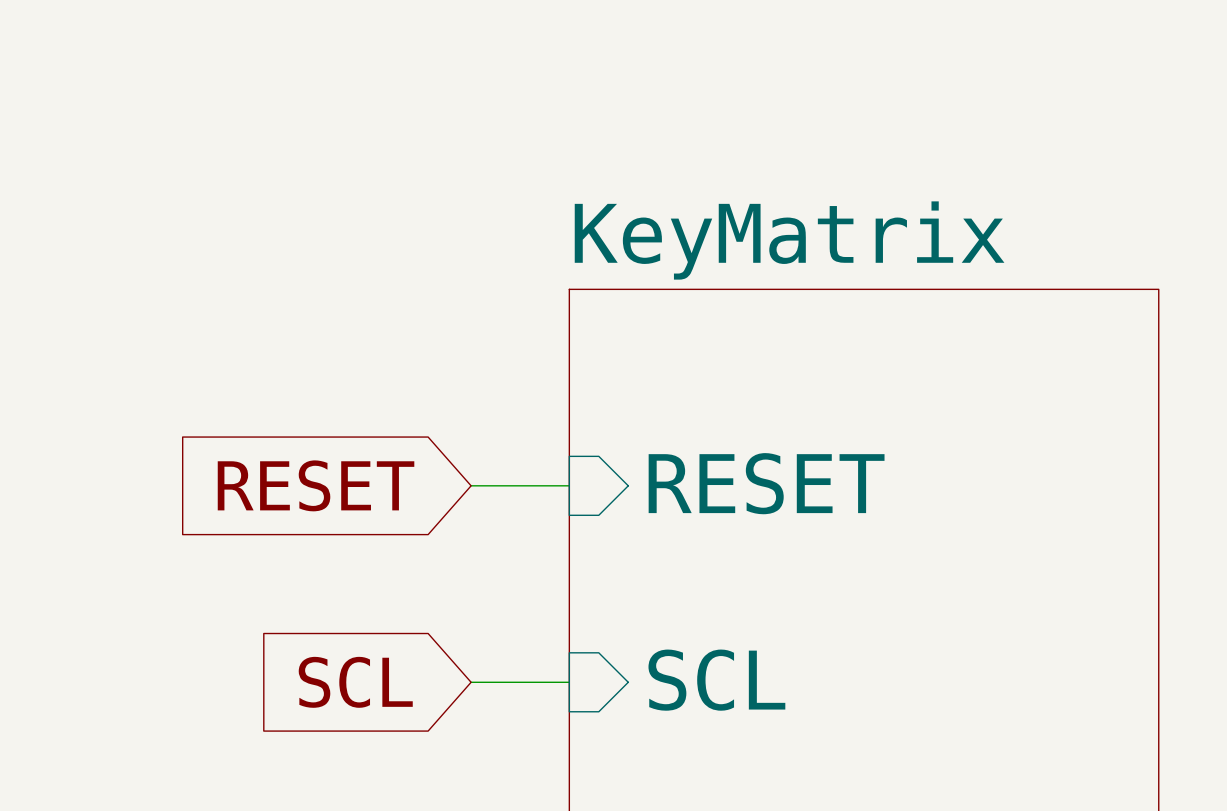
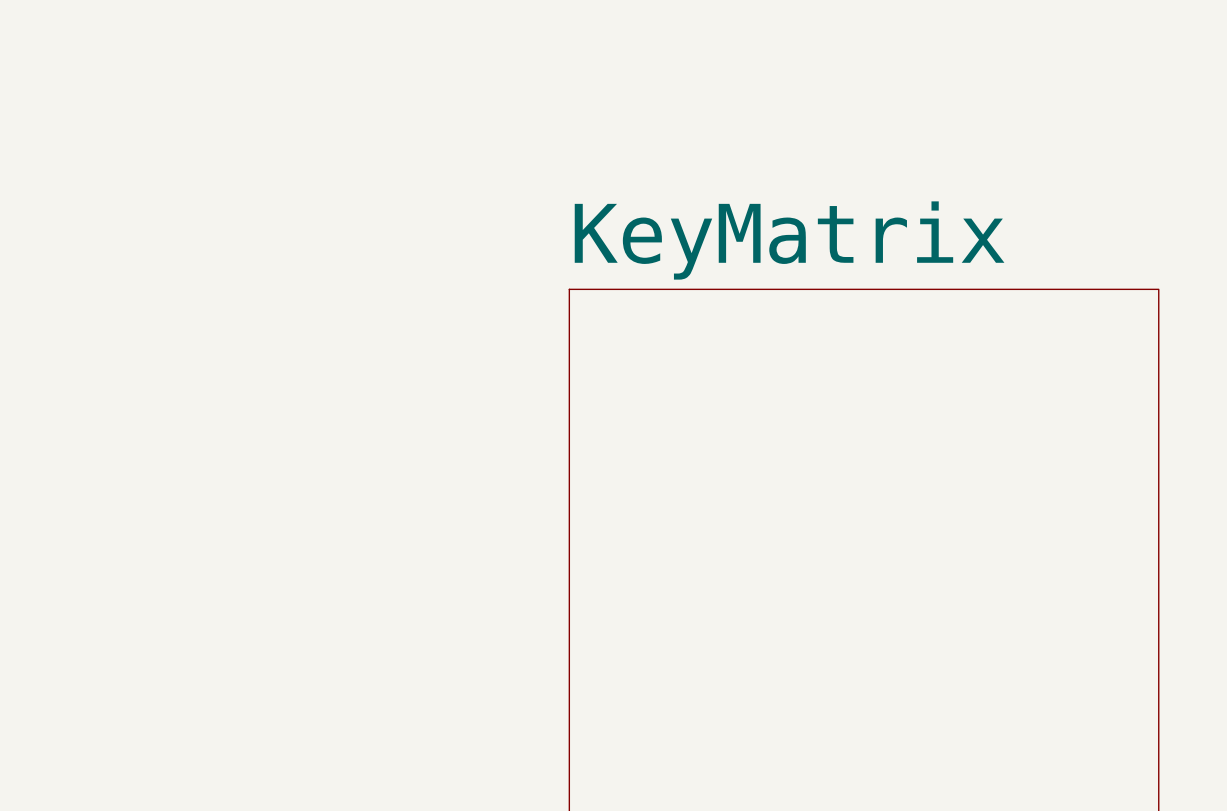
sheet pin: RESET (766, 483) -> none
global label: RESET (316, 485) -> none
wire: (471, 485) (569, 485) -> none
sheet pin: SCL (716, 680) -> none
global label: SCL (355, 682) -> none
wire: (471, 682) (569, 682) -> none

